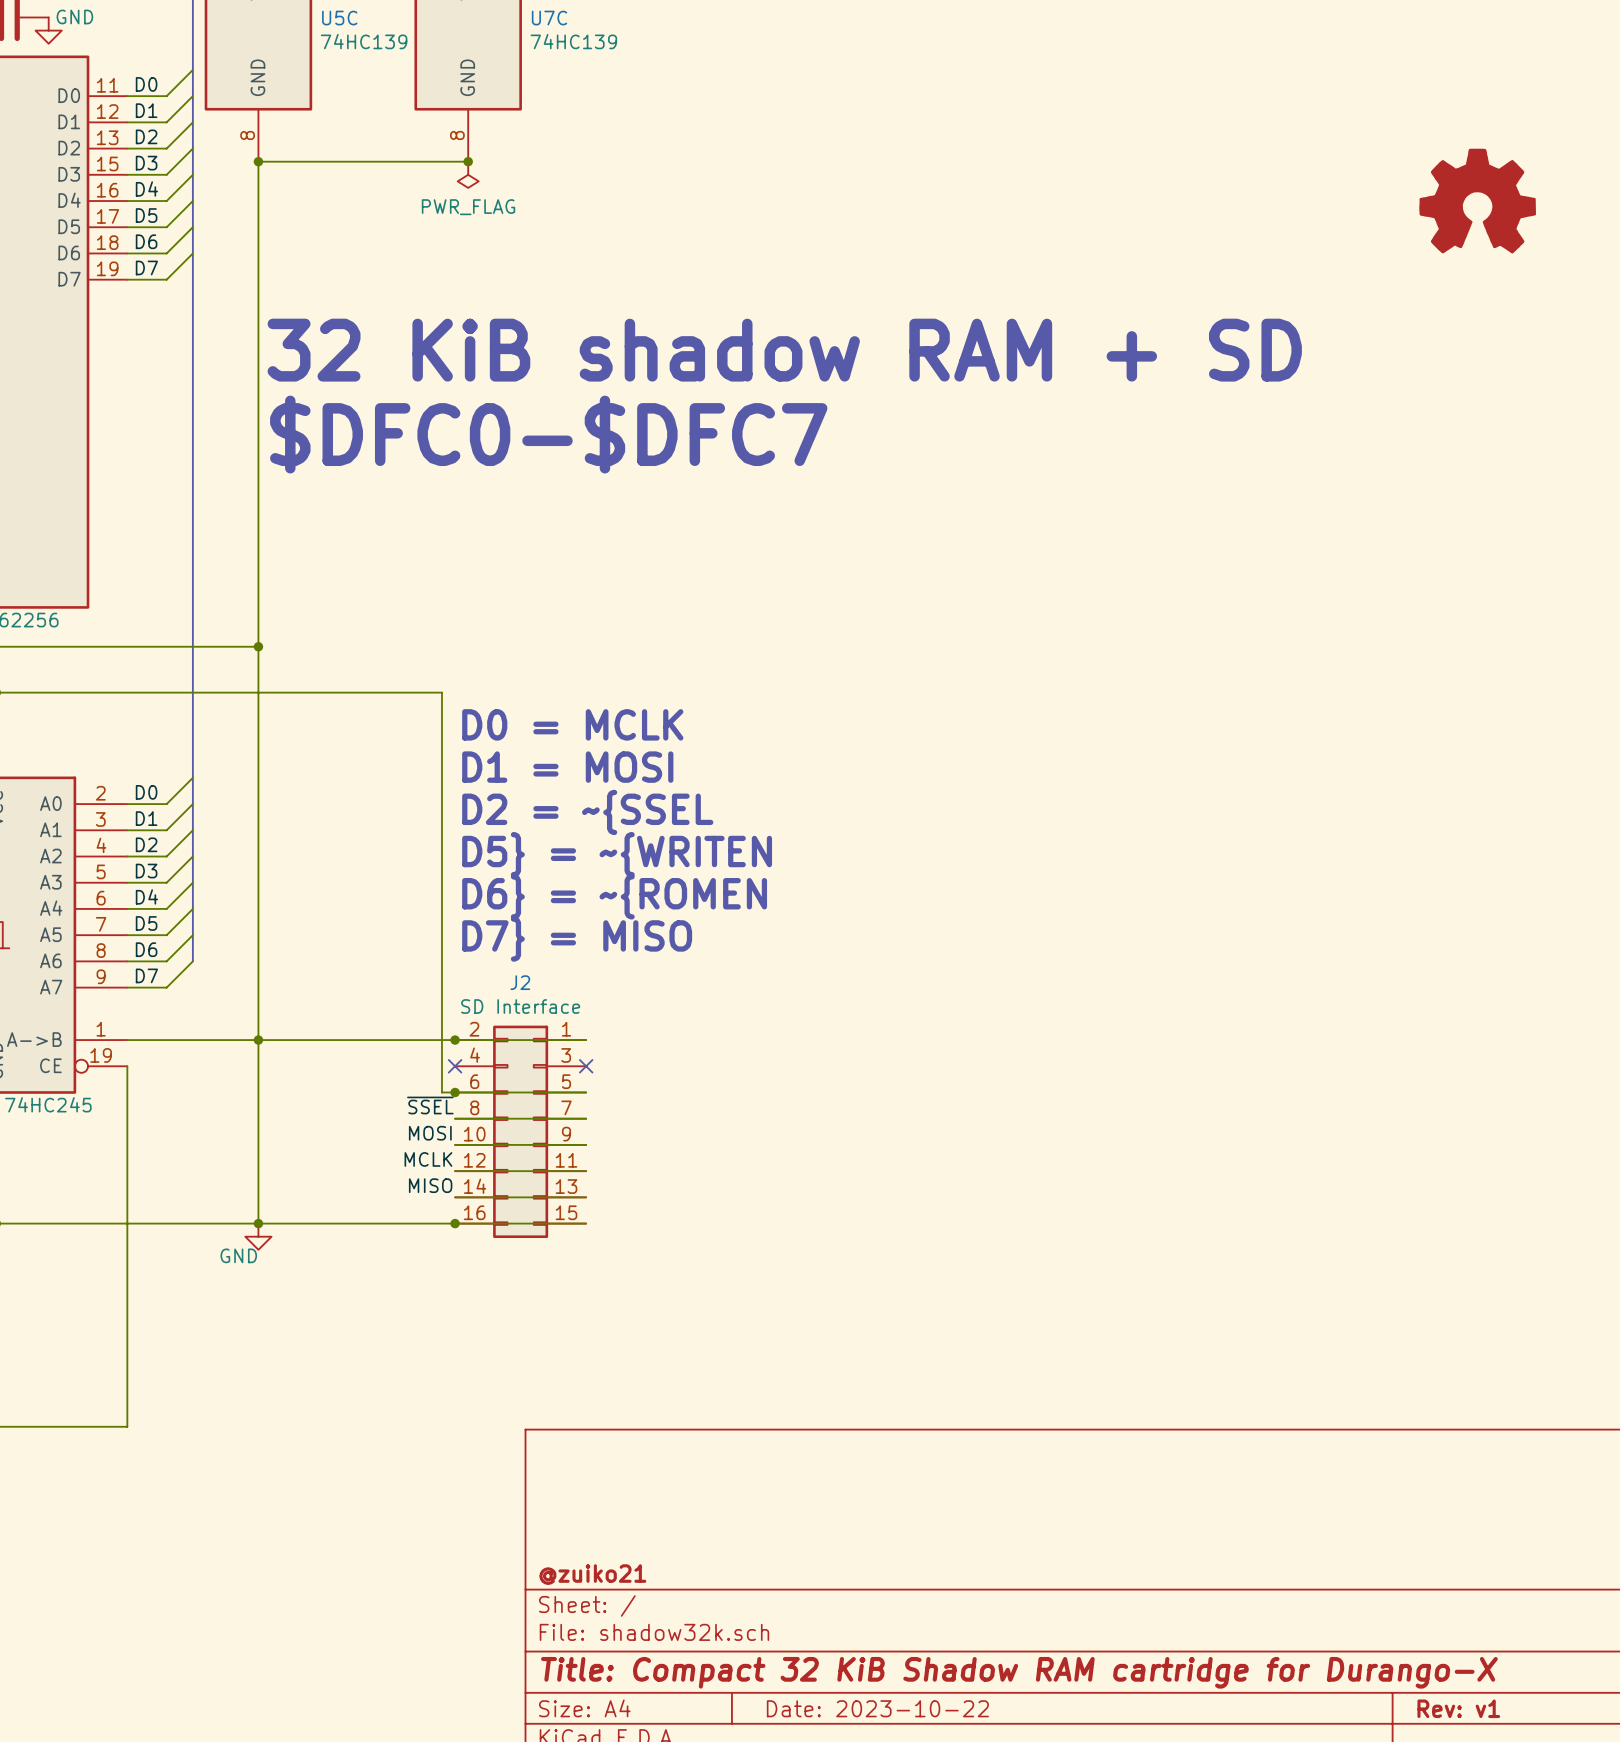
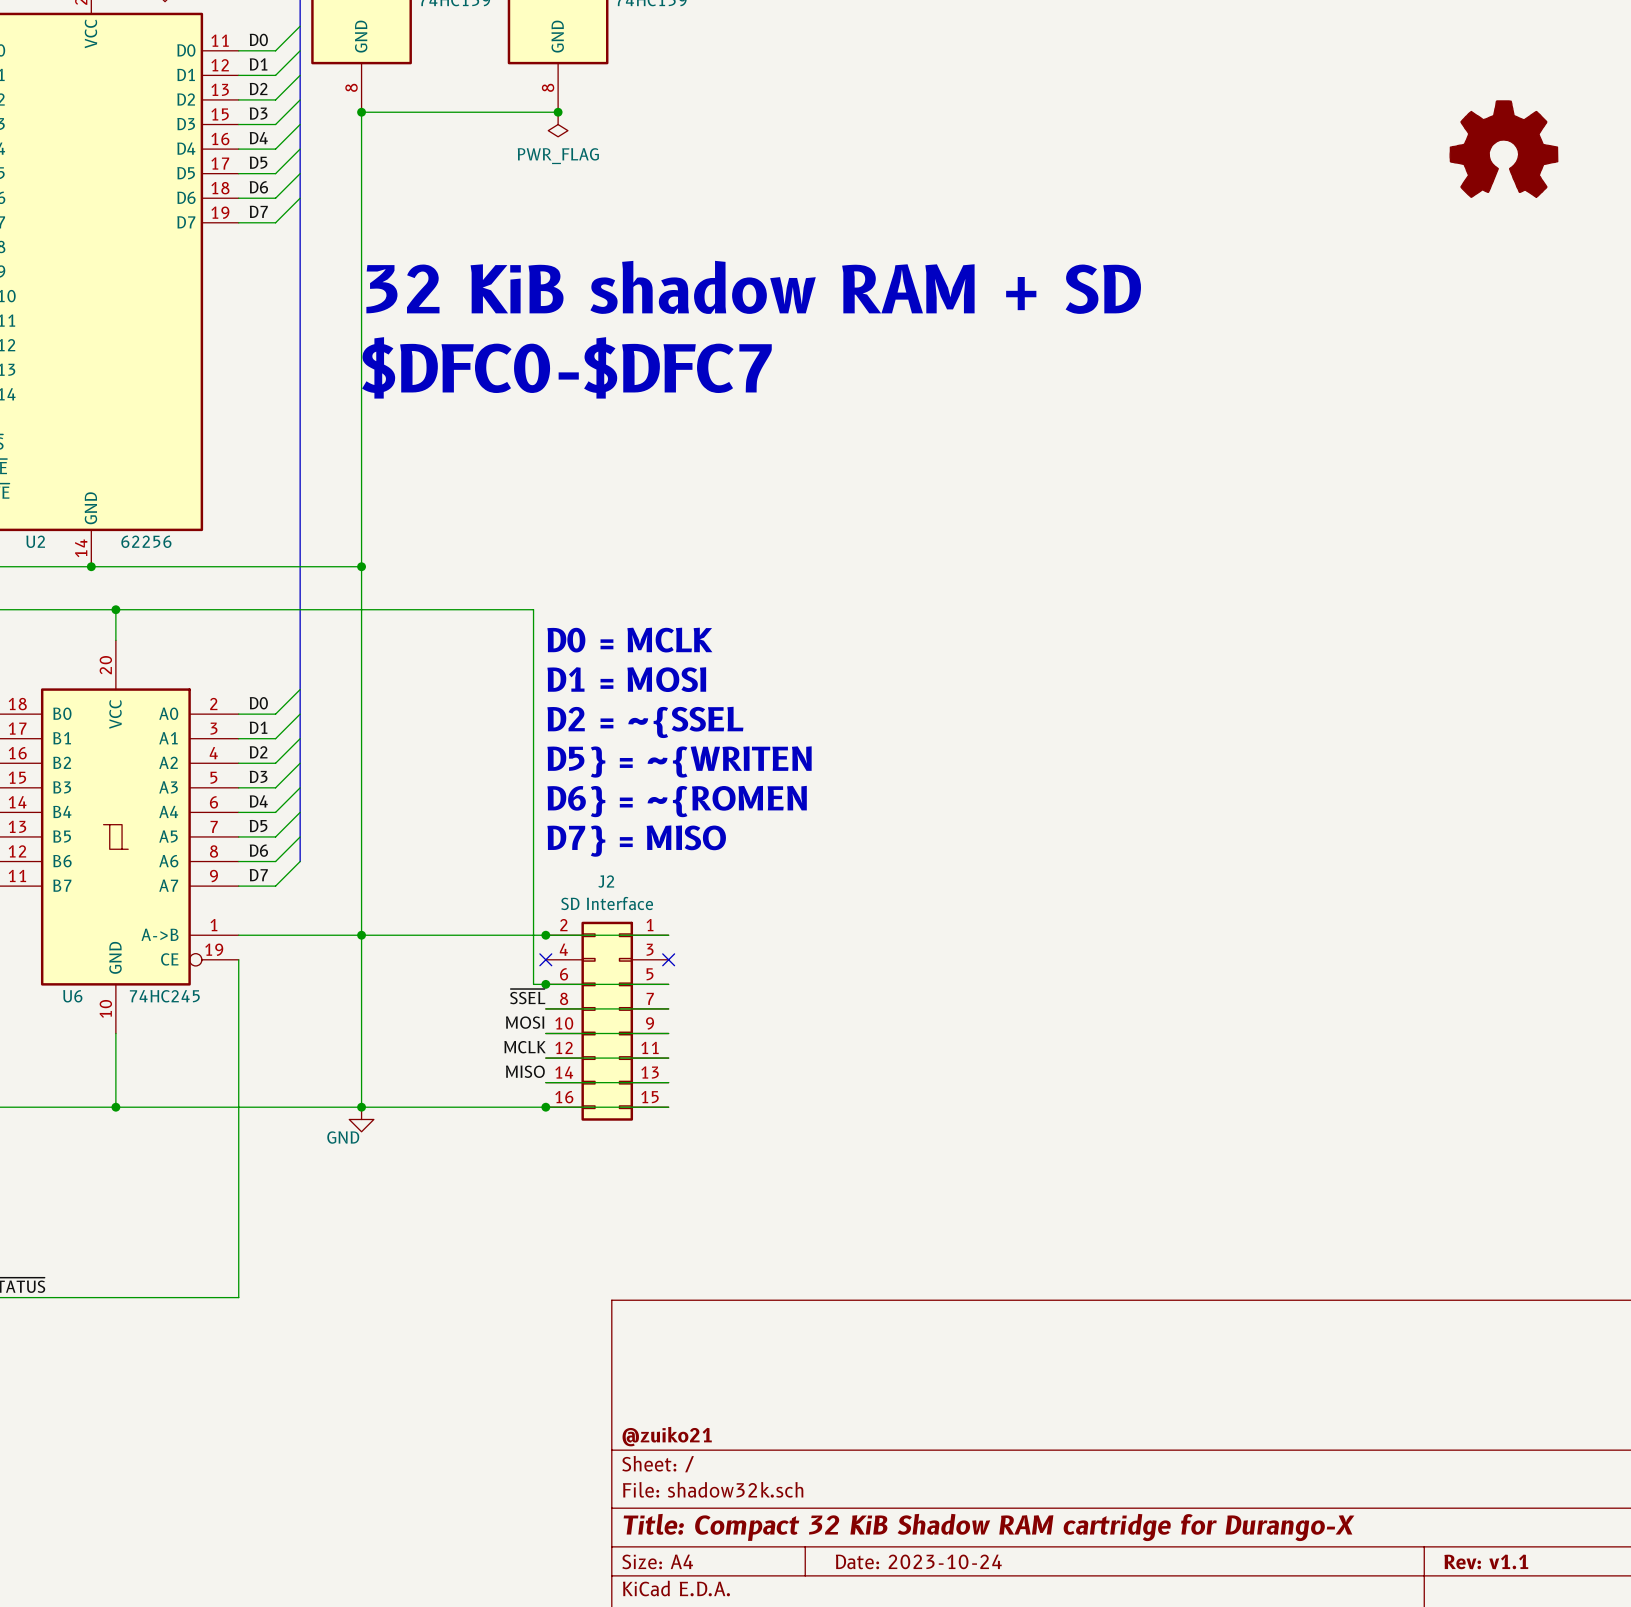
title block: Date: 2023-10-22 (877, 1708) -> Date: 2023-10-24 (918, 1561)
title block: Rev: v1 (1458, 1708) -> Rev: v1.1 (1486, 1561)

